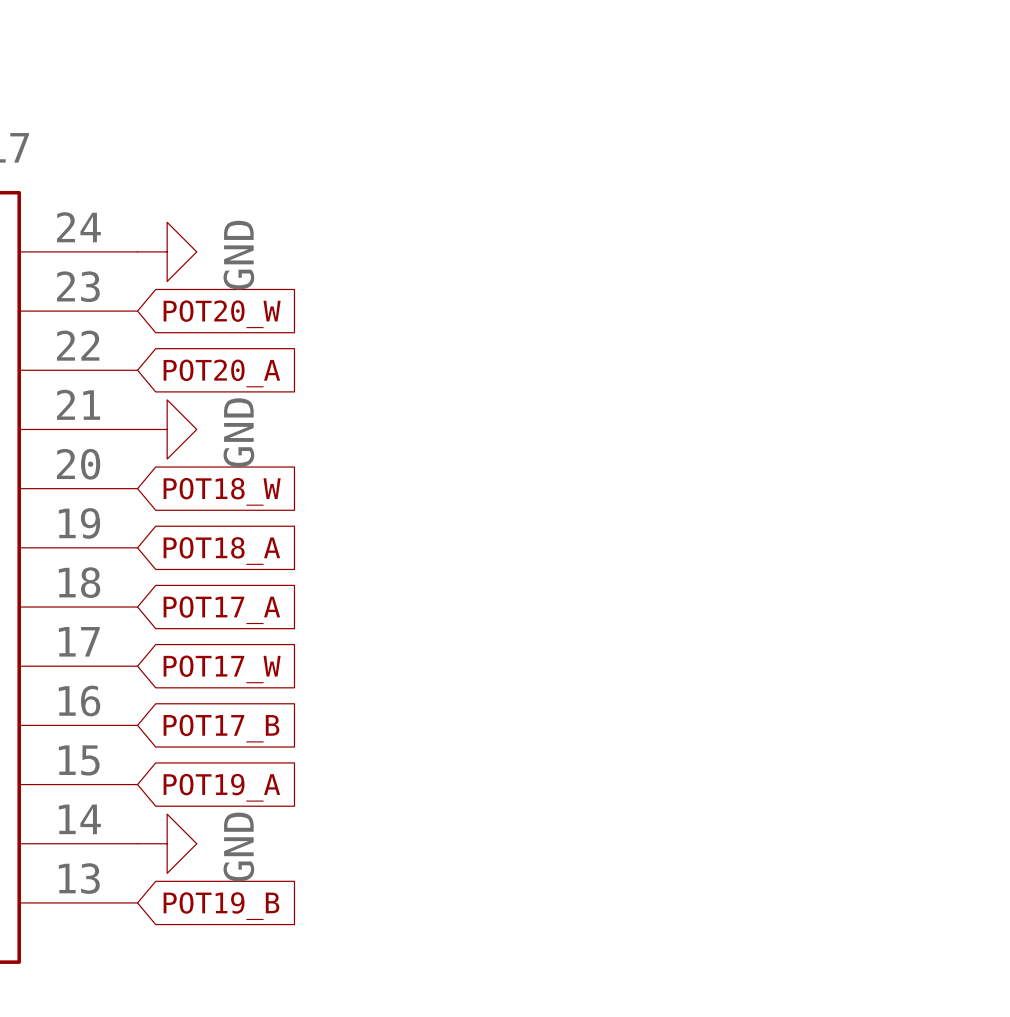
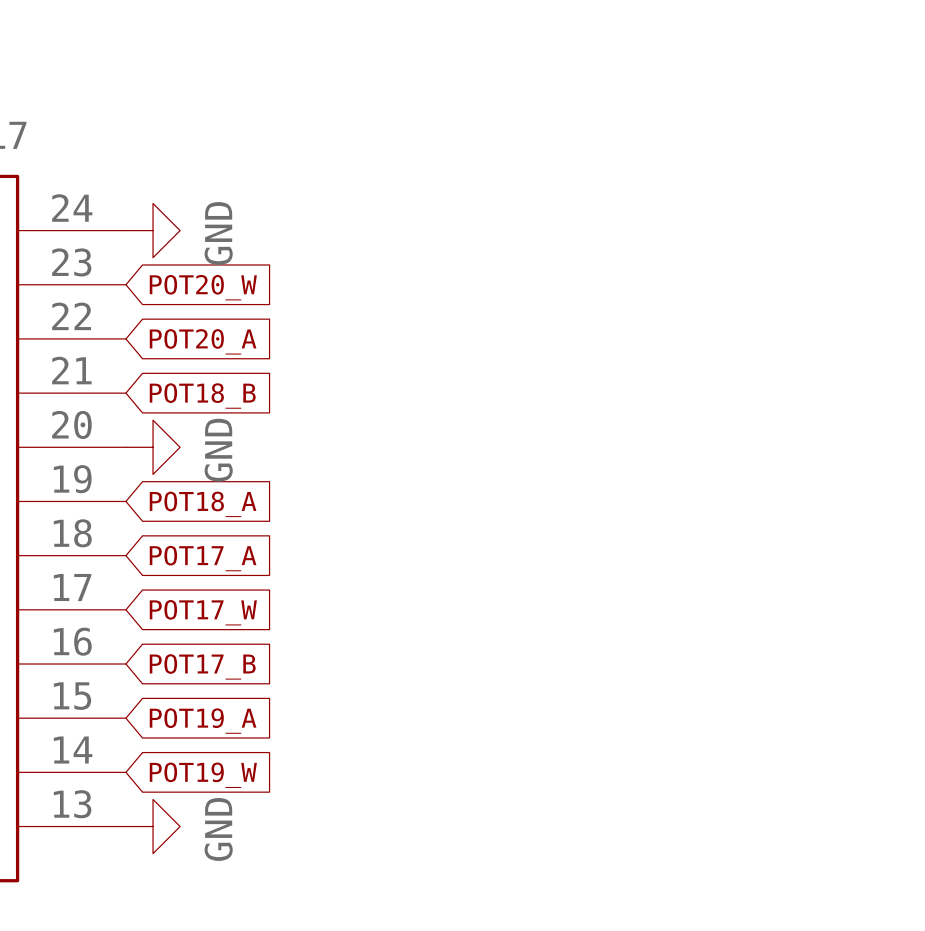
power symbol position: GND (167, 429) -> GND (153, 447)
global label: none -> POT18_B (202, 396)
global label: POT18_W (222, 491) -> none
power symbol position: GND (167, 843) -> GND (153, 826)
global label: none -> POT19_W (203, 775)
global label: POT19_B (221, 906) -> none

